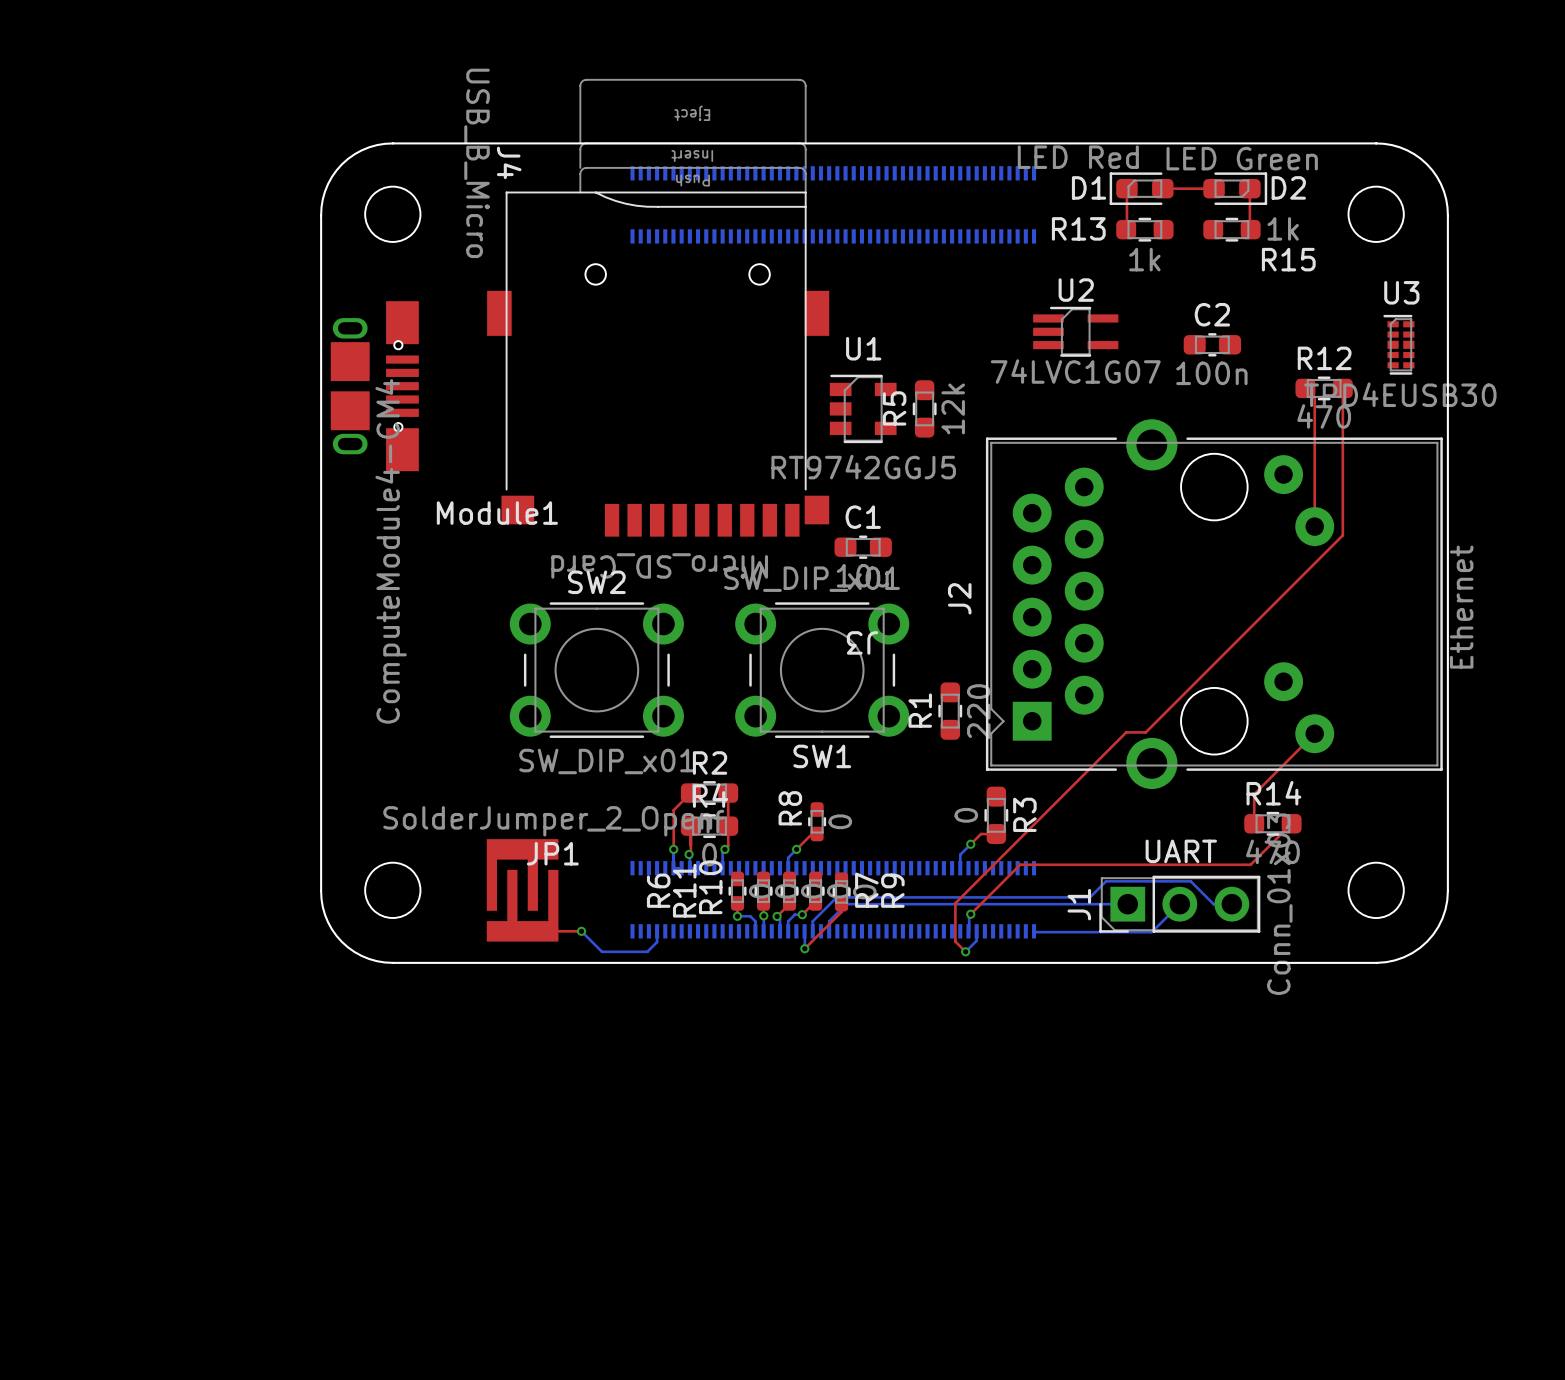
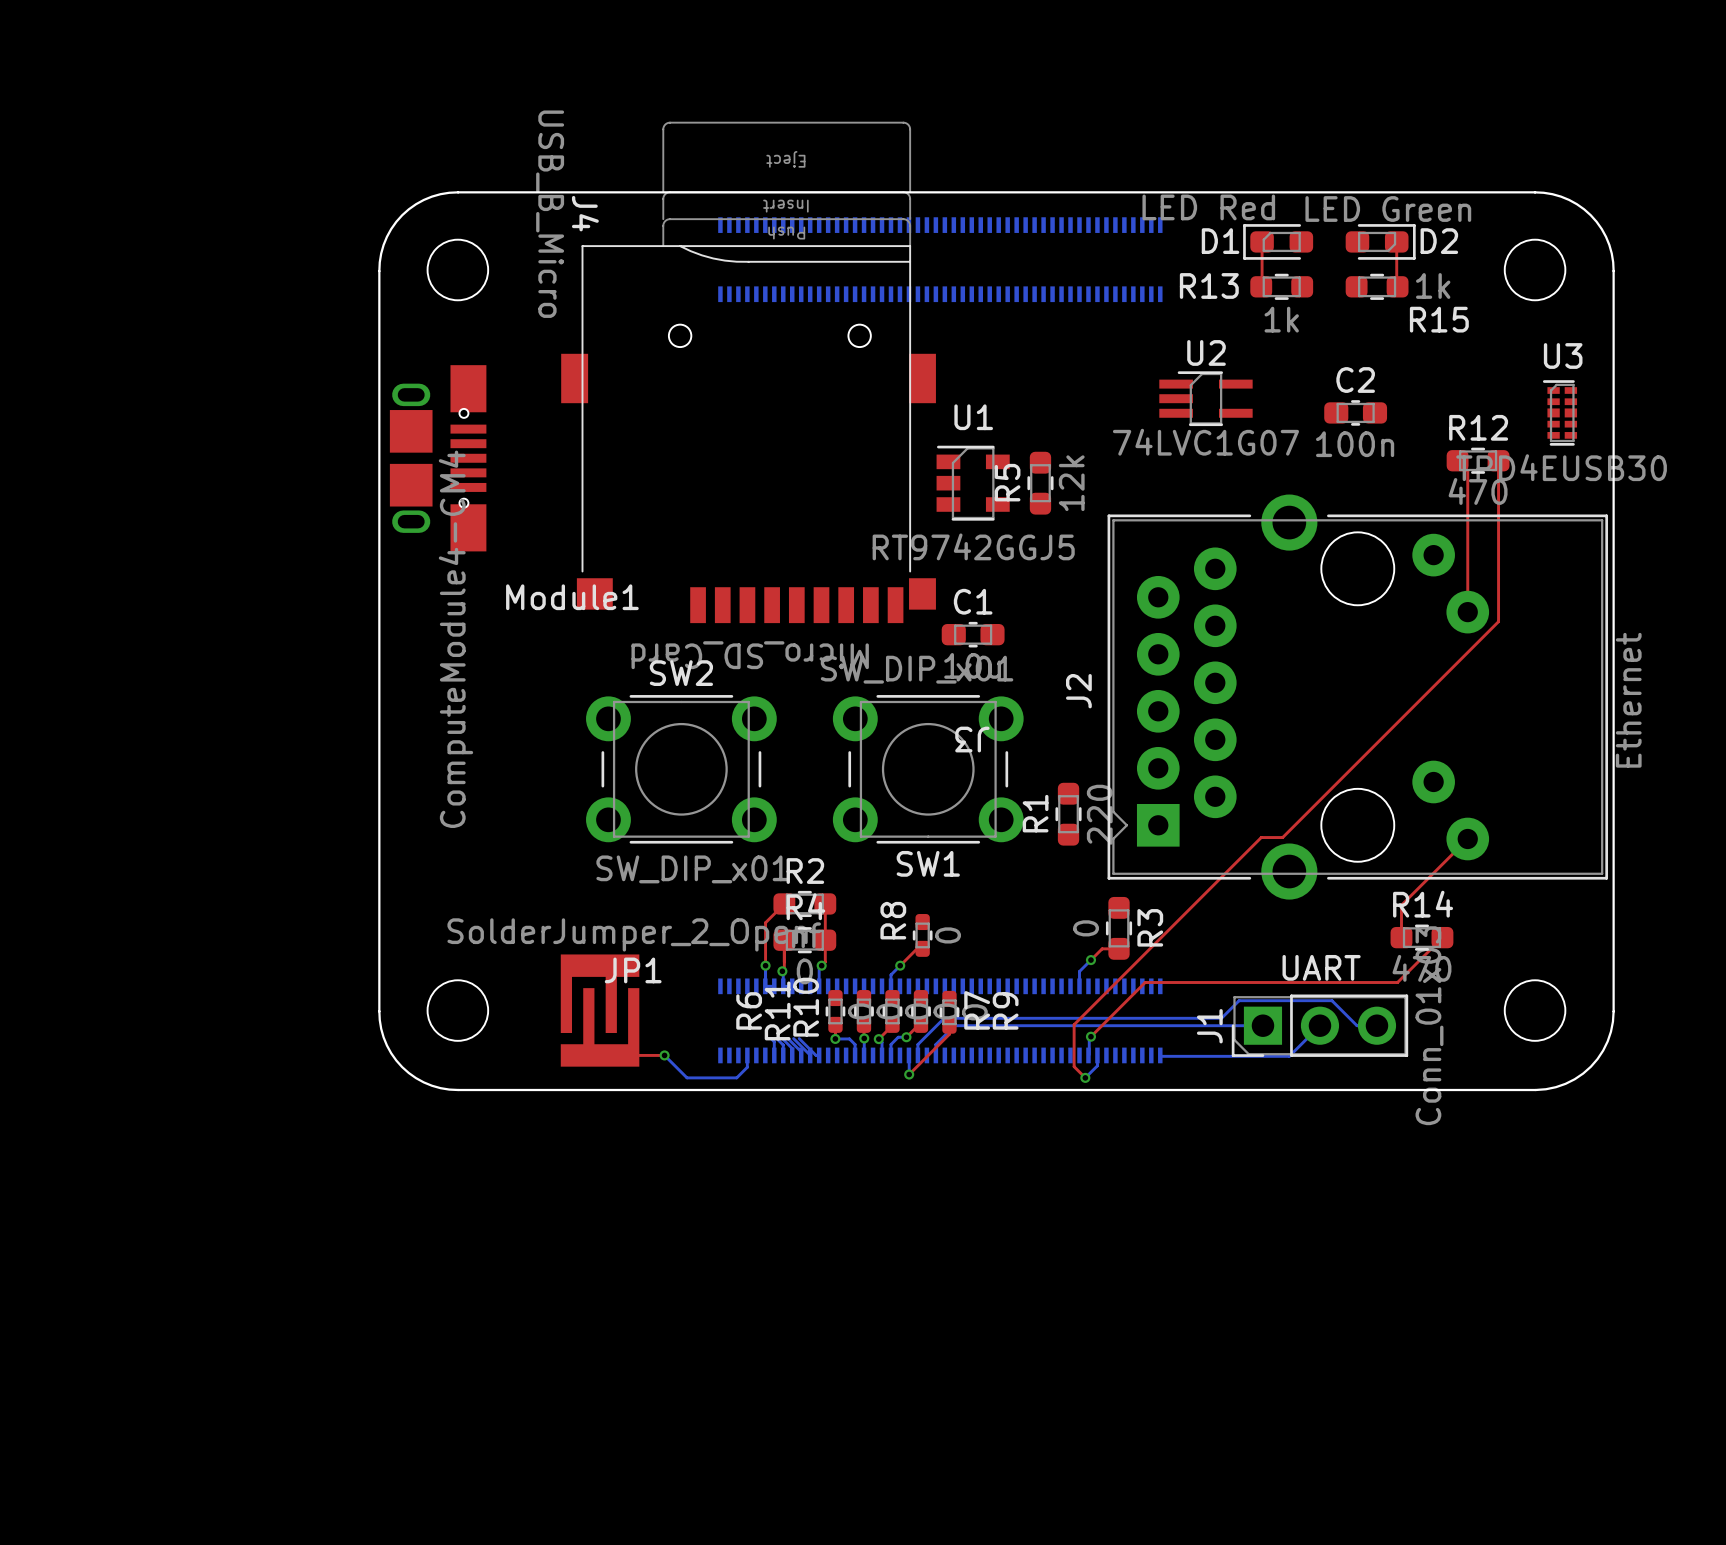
top track: (1162, 188) (1214, 188) -> none
bottom track: none -> (771, 1038) (774, 1041) (774, 1055)
bottom track: none -> (776, 1038) (783, 1045) (783, 1055)
bottom track: none -> (782, 1038) (792, 1048) (792, 1055)
bottom track: none -> (788, 1038) (801, 1051) (801, 1055)
bottom track: none -> (793, 1038) (810, 1055)
bottom track: none -> (799, 1038) (816, 1055) (819, 1055)

